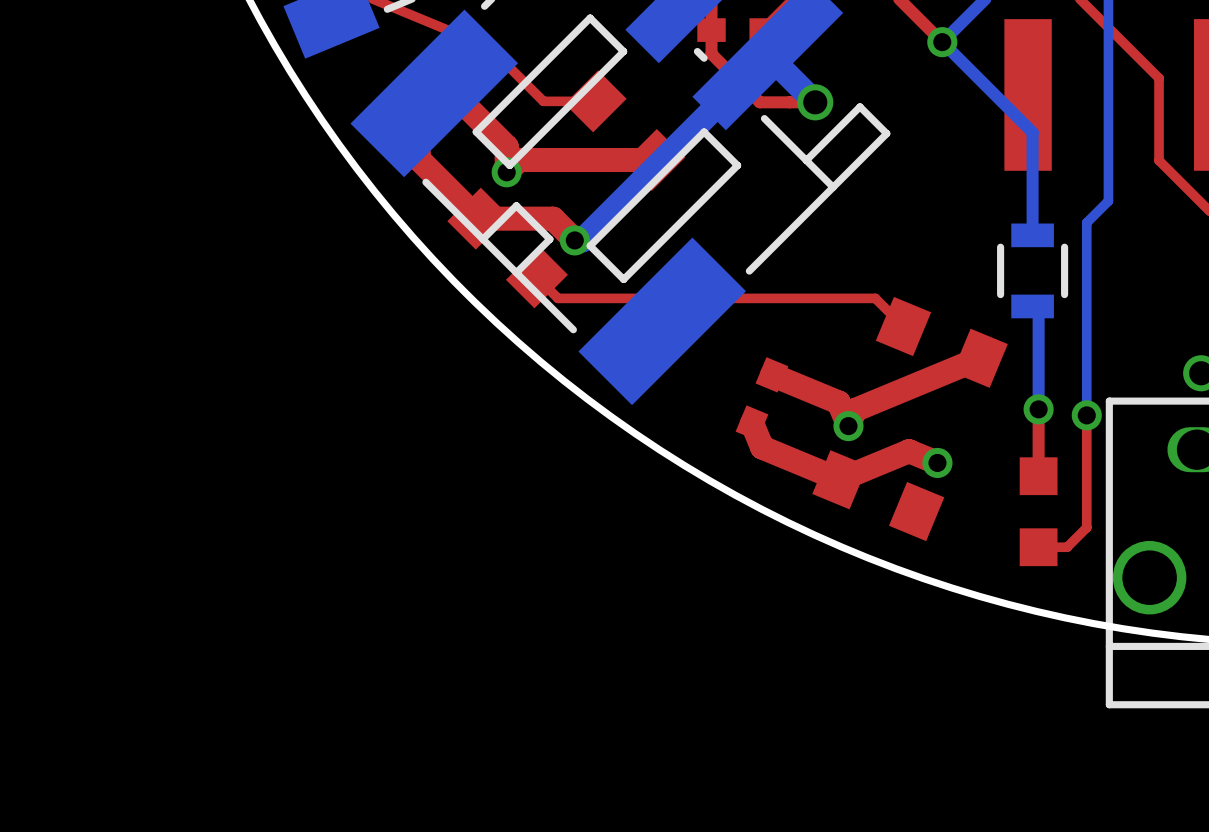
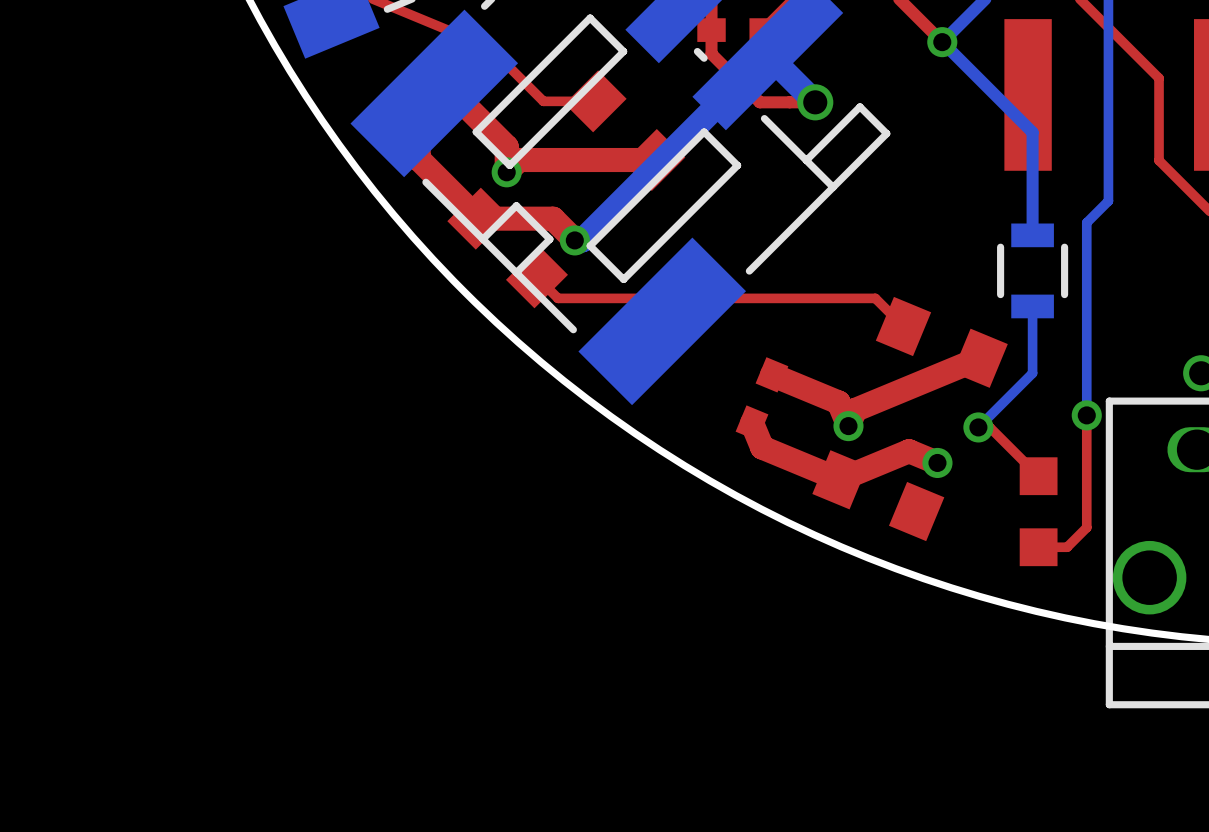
bottom track: (1032, 306) (1038, 312) (1038, 409) -> (1032, 306) (1032, 373) (978, 427)
top track: (1038, 409) (1038, 476) -> (978, 427) (989, 427) (1038, 476)
via position: (1038, 409) -> (978, 427)

